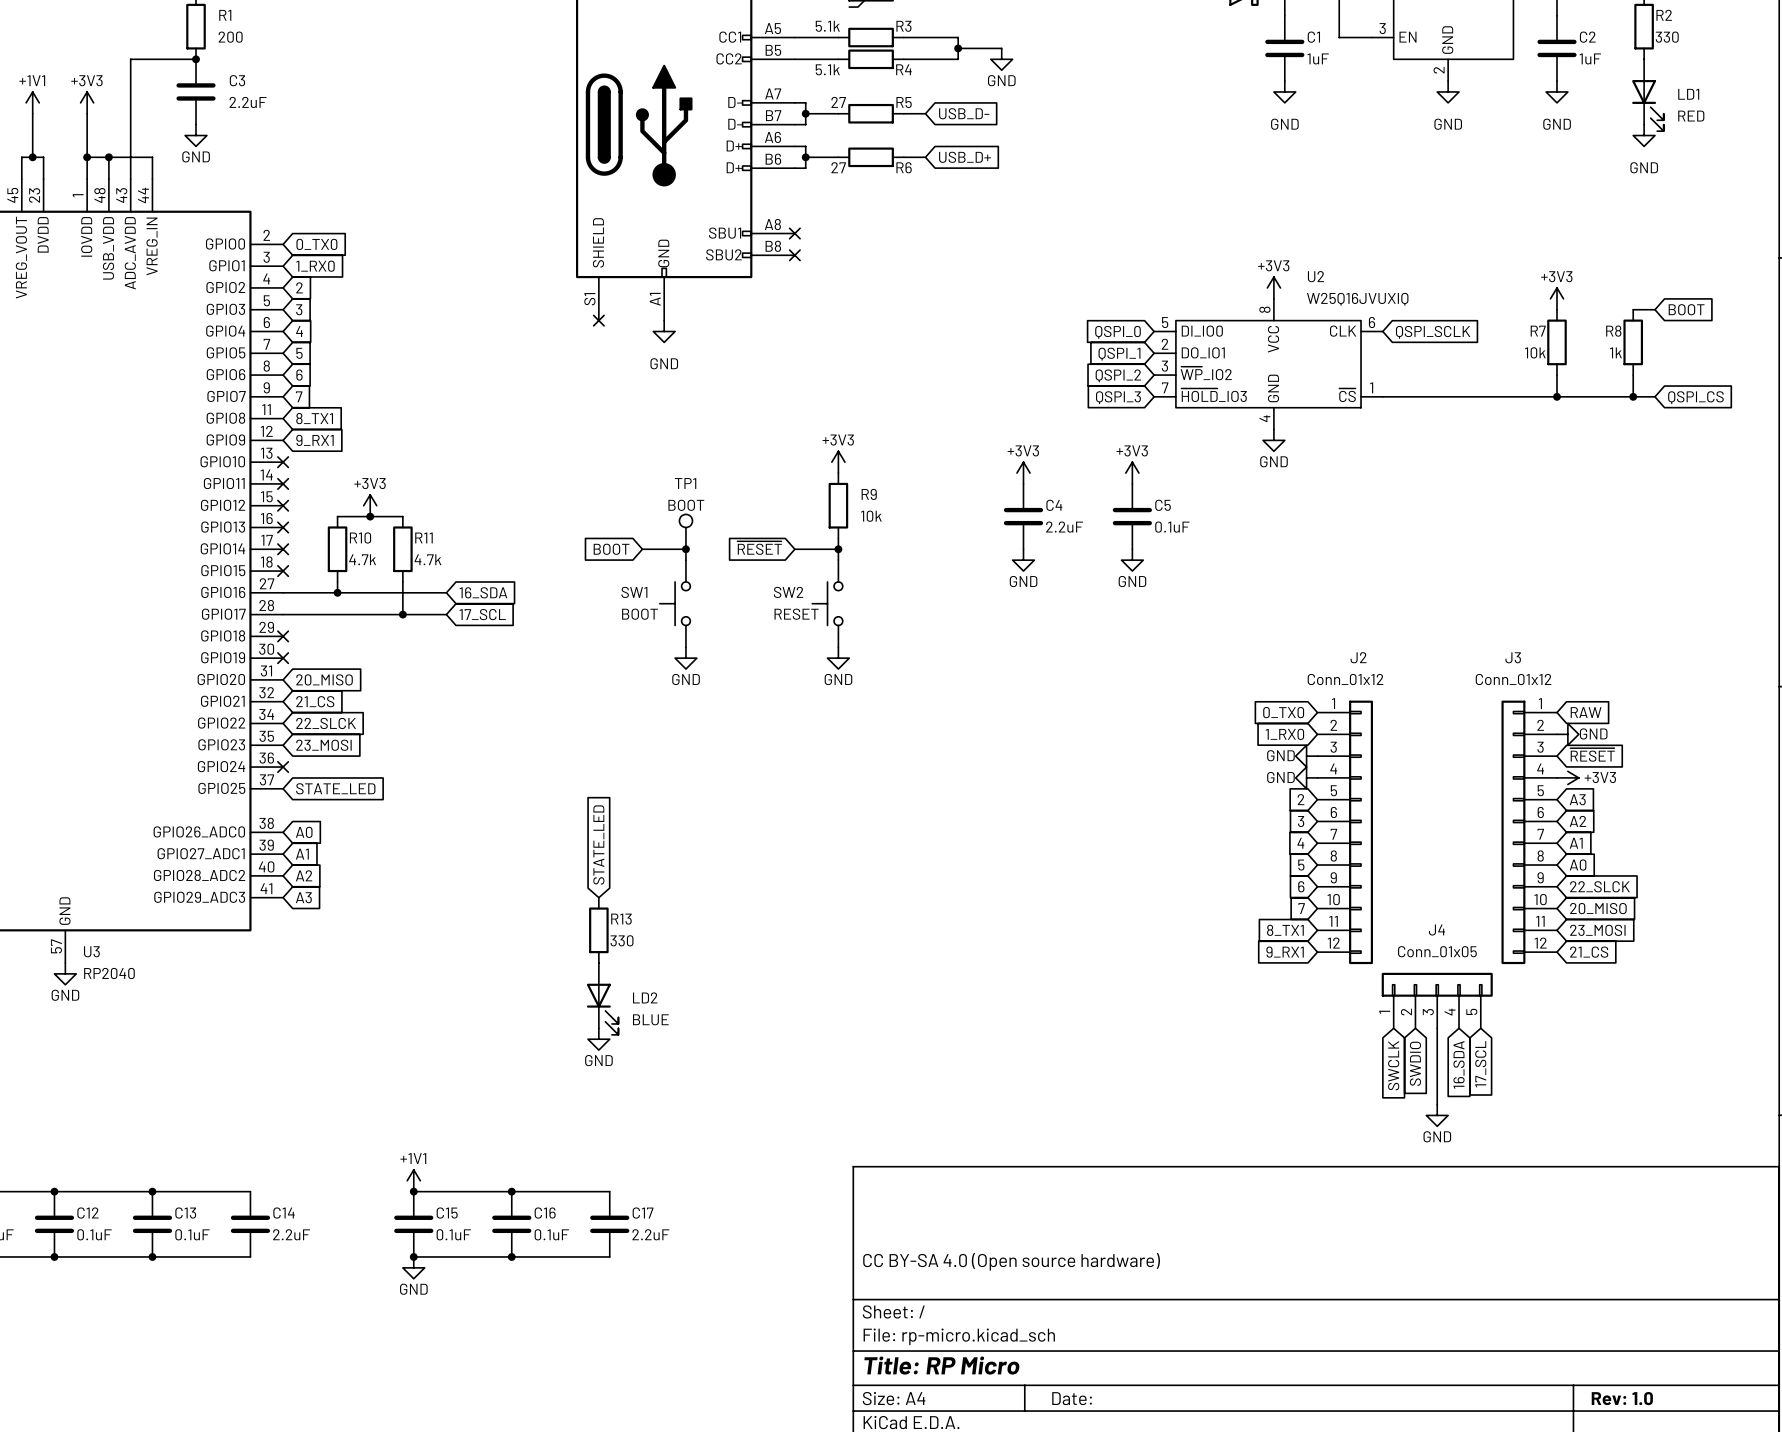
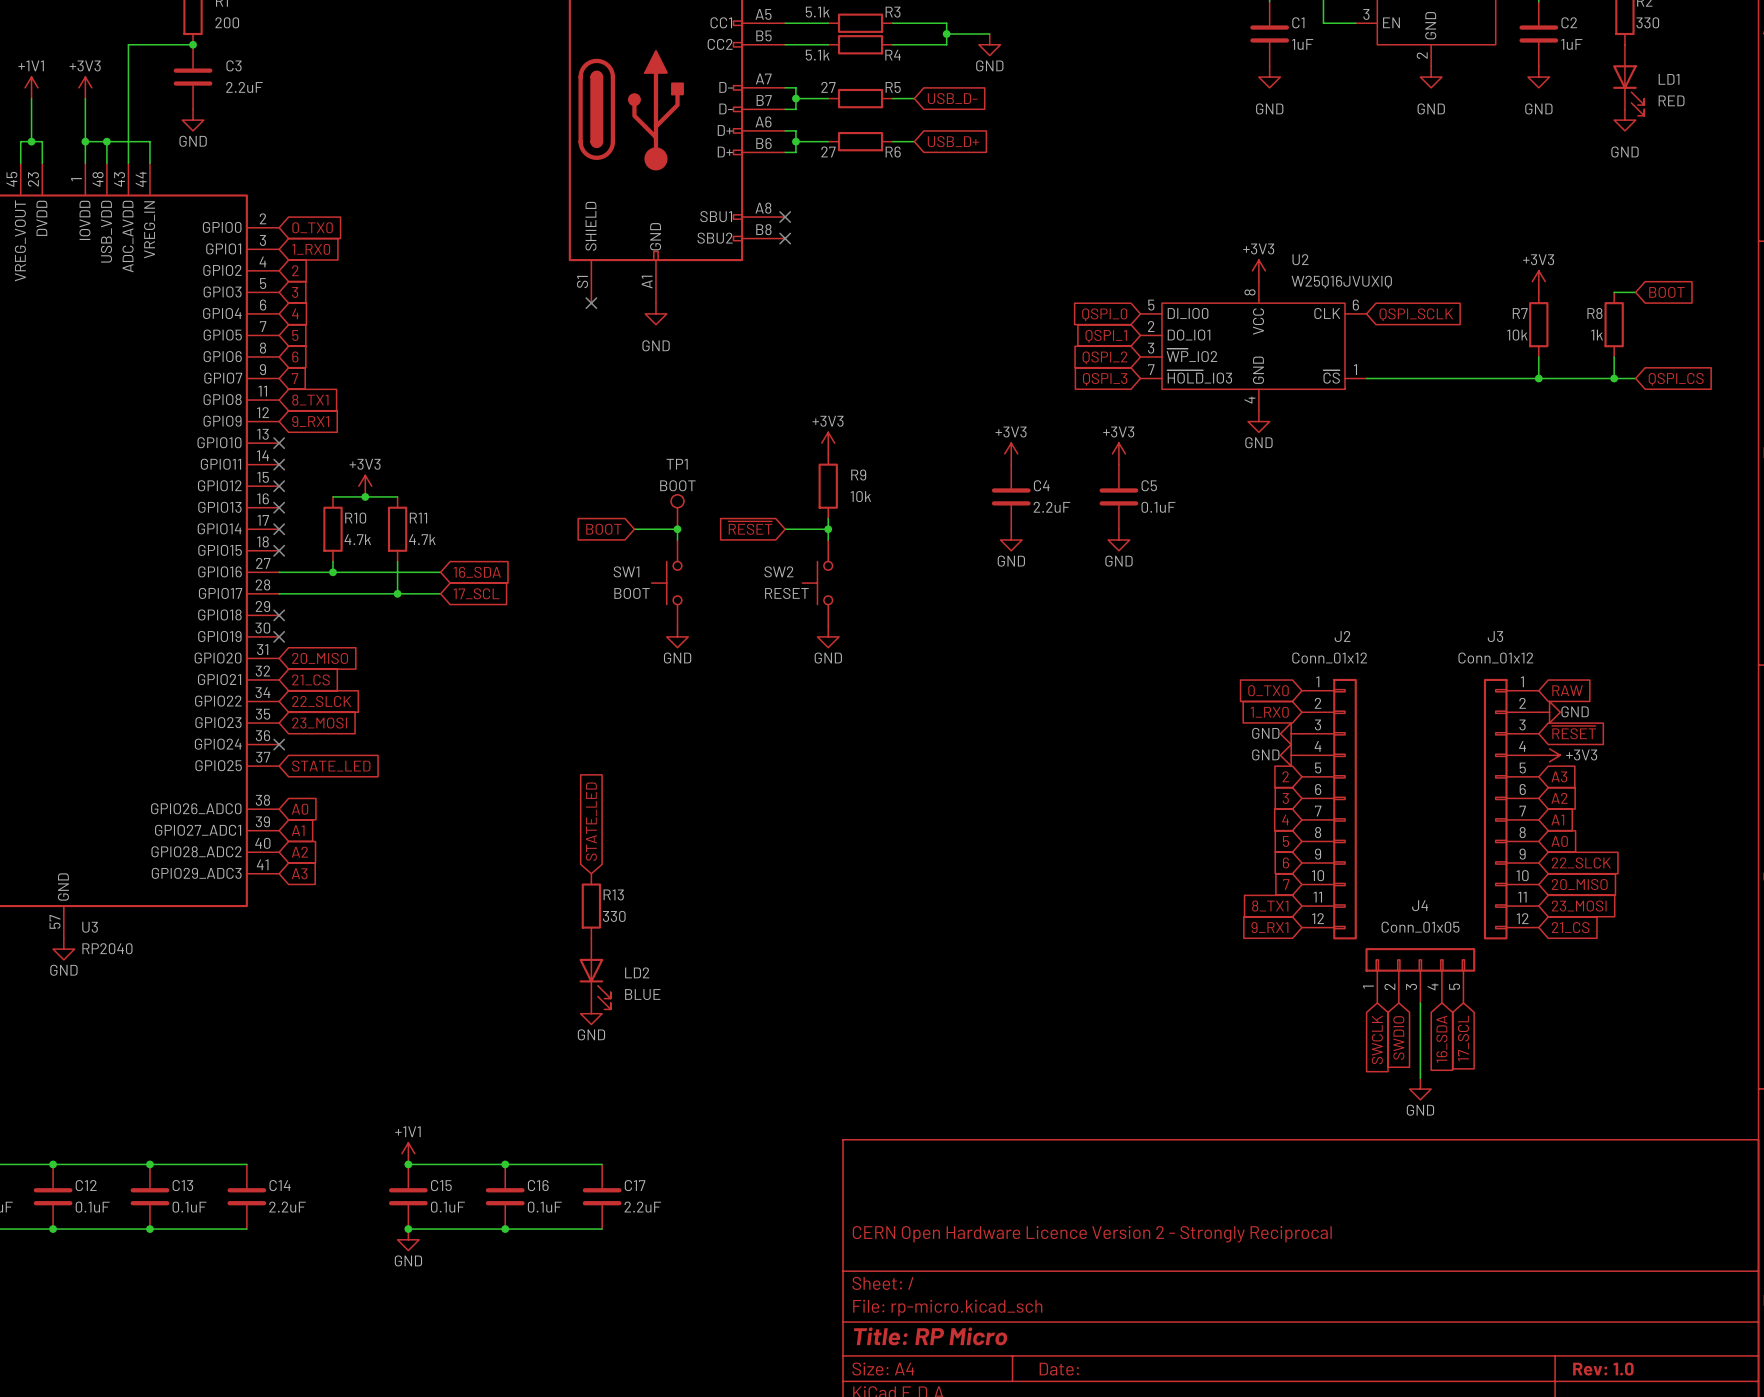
title block: CC BY-SA 4.0 (Open source hardware) (1011, 1261) -> CERN Open Hardware Licence Version 2 - Strongly Reciprocal (1092, 1234)

